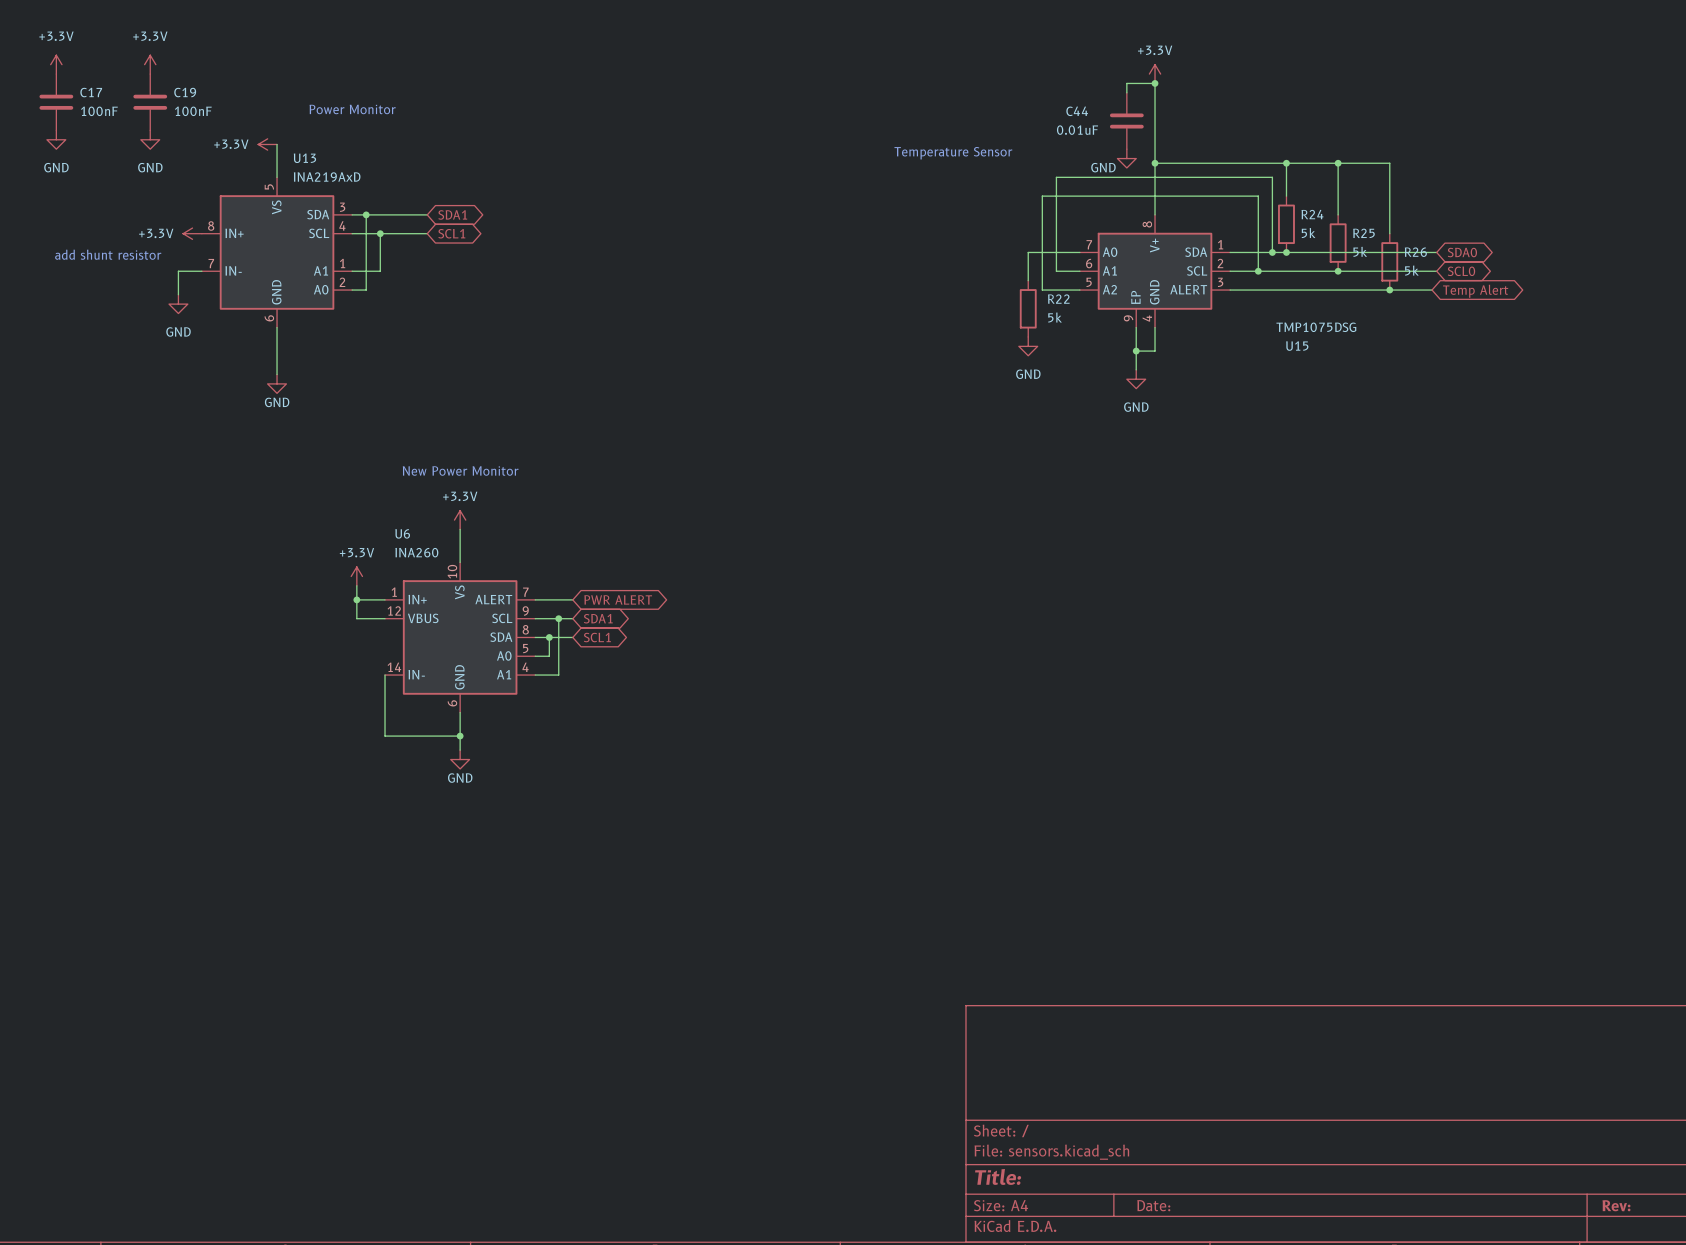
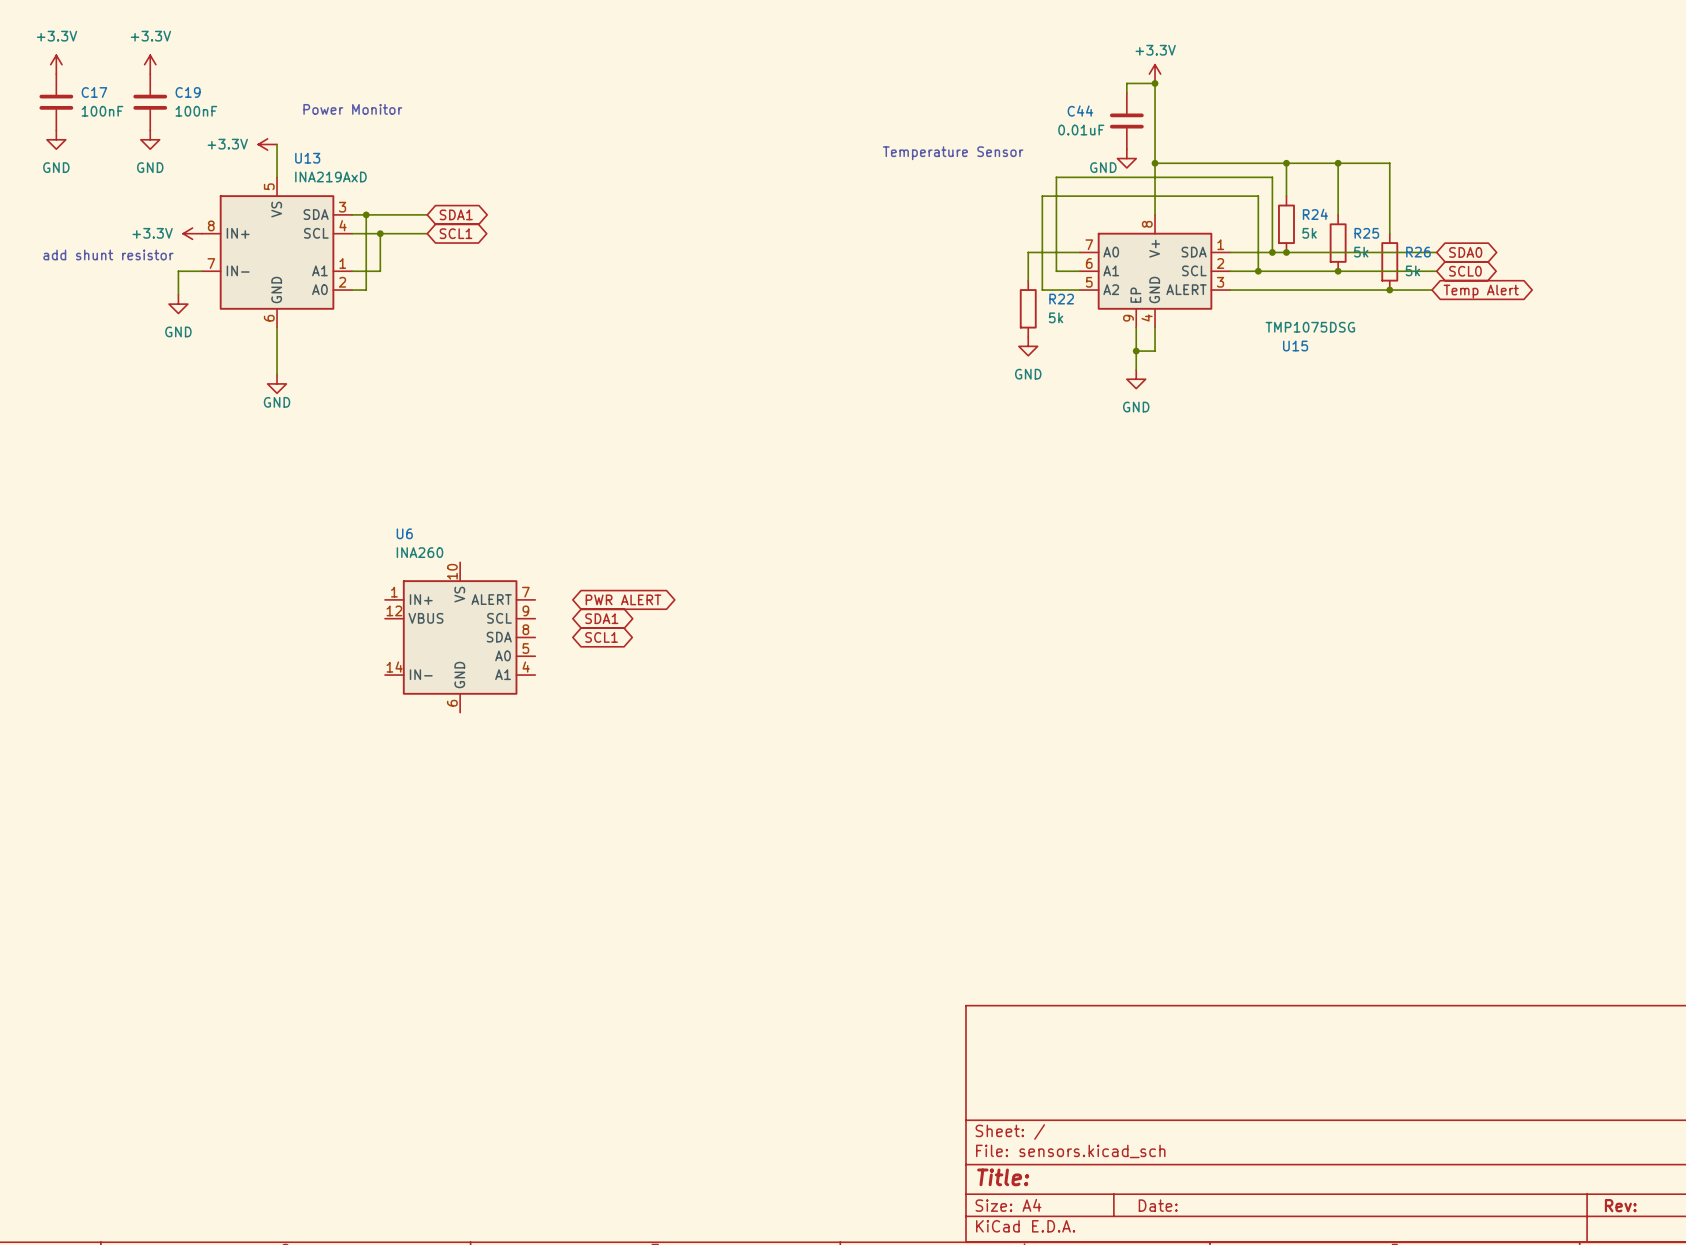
text: New Power Monitor (460, 470) -> none
power symbol: +3.3V (460, 520) -> none
wire: (460, 529) (460, 562) -> none
power symbol: +3.3V (356, 576) -> none
wire: (356, 585) (356, 618) (385, 618) -> none
wire: (356, 599) (385, 599) -> none
junction: (356, 599) -> none
wire: (535, 599) (572, 599) -> none
wire: (535, 618) (572, 618) -> none
wire: (558, 618) (558, 675) (535, 675) -> none
junction: (558, 618) -> none
wire: (535, 637) (572, 637) -> none
wire: (549, 637) (549, 656) (535, 656) -> none
junction: (549, 637) -> none
wire: (385, 675) (385, 736) (460, 736) -> none
wire: (460, 712) (460, 750) -> none
junction: (460, 736) -> none
power symbol: GND (460, 759) -> none

